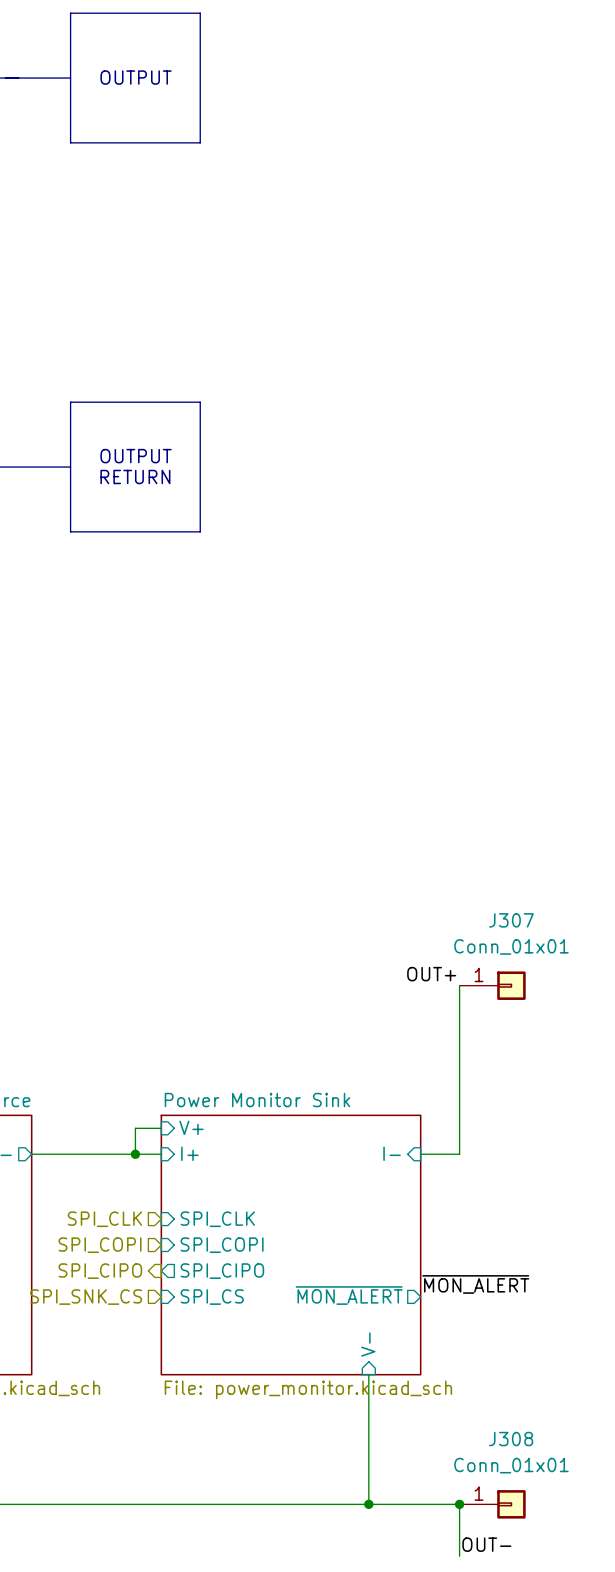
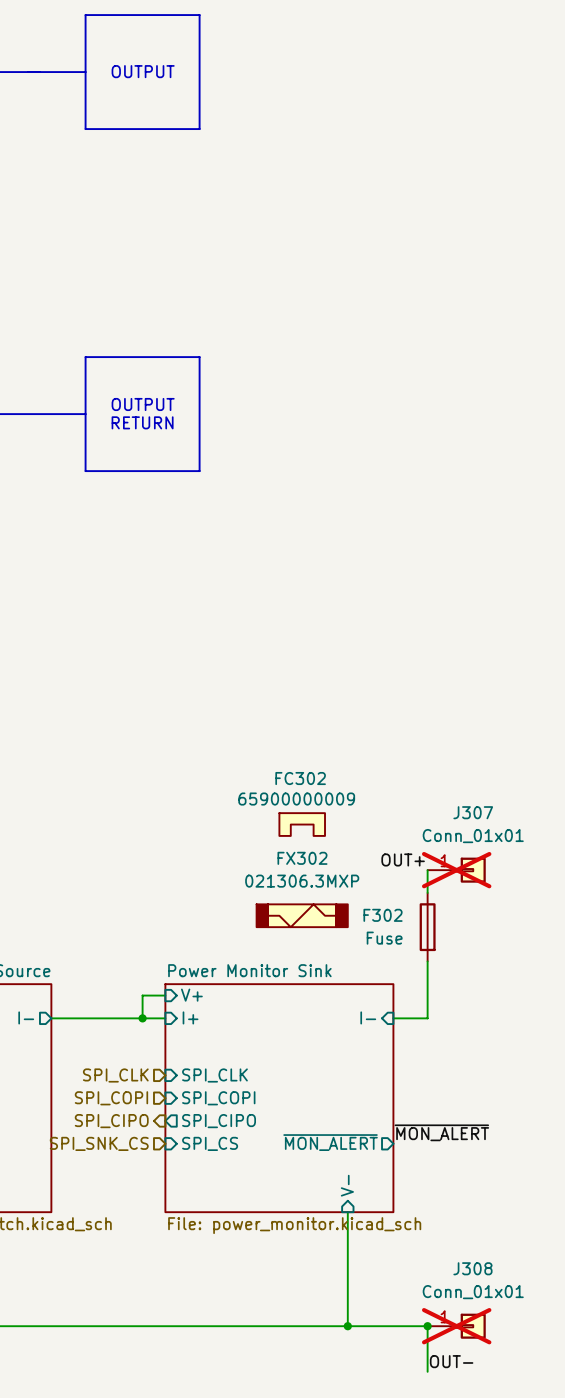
FC302: none -> 65900000009 (302, 824)
J307 do-not-place cross: none -> (456, 870)
FX302: none -> 021306.3MXP (302, 915)
F302: none -> Fuse (427, 927)
J308 do-not-place cross: none -> (456, 1326)

